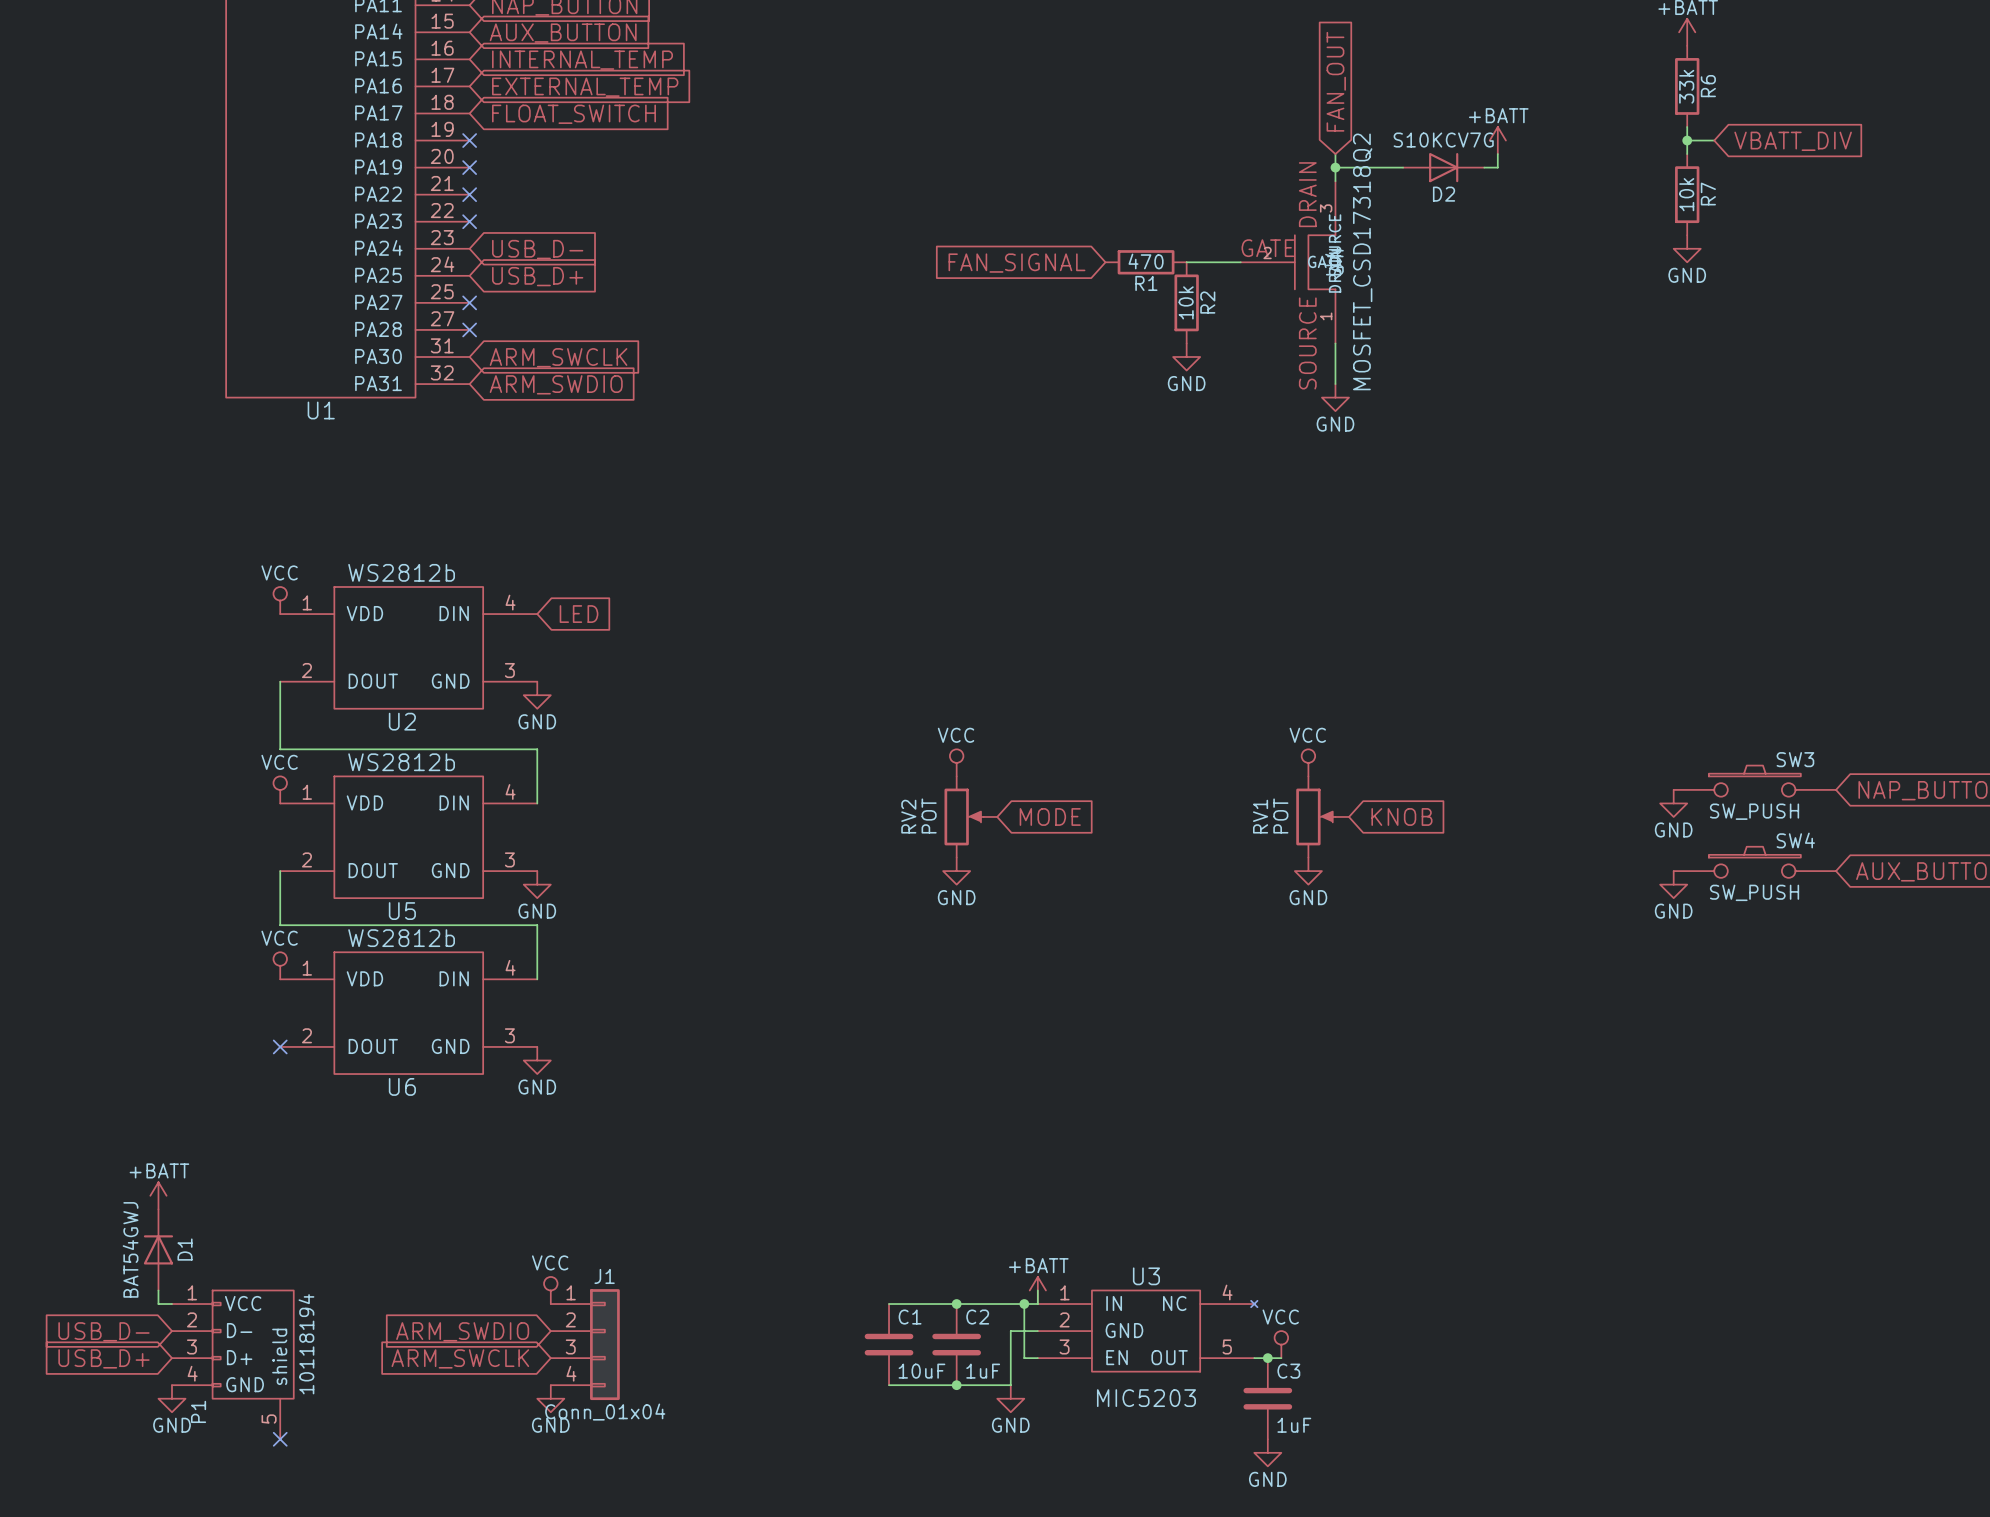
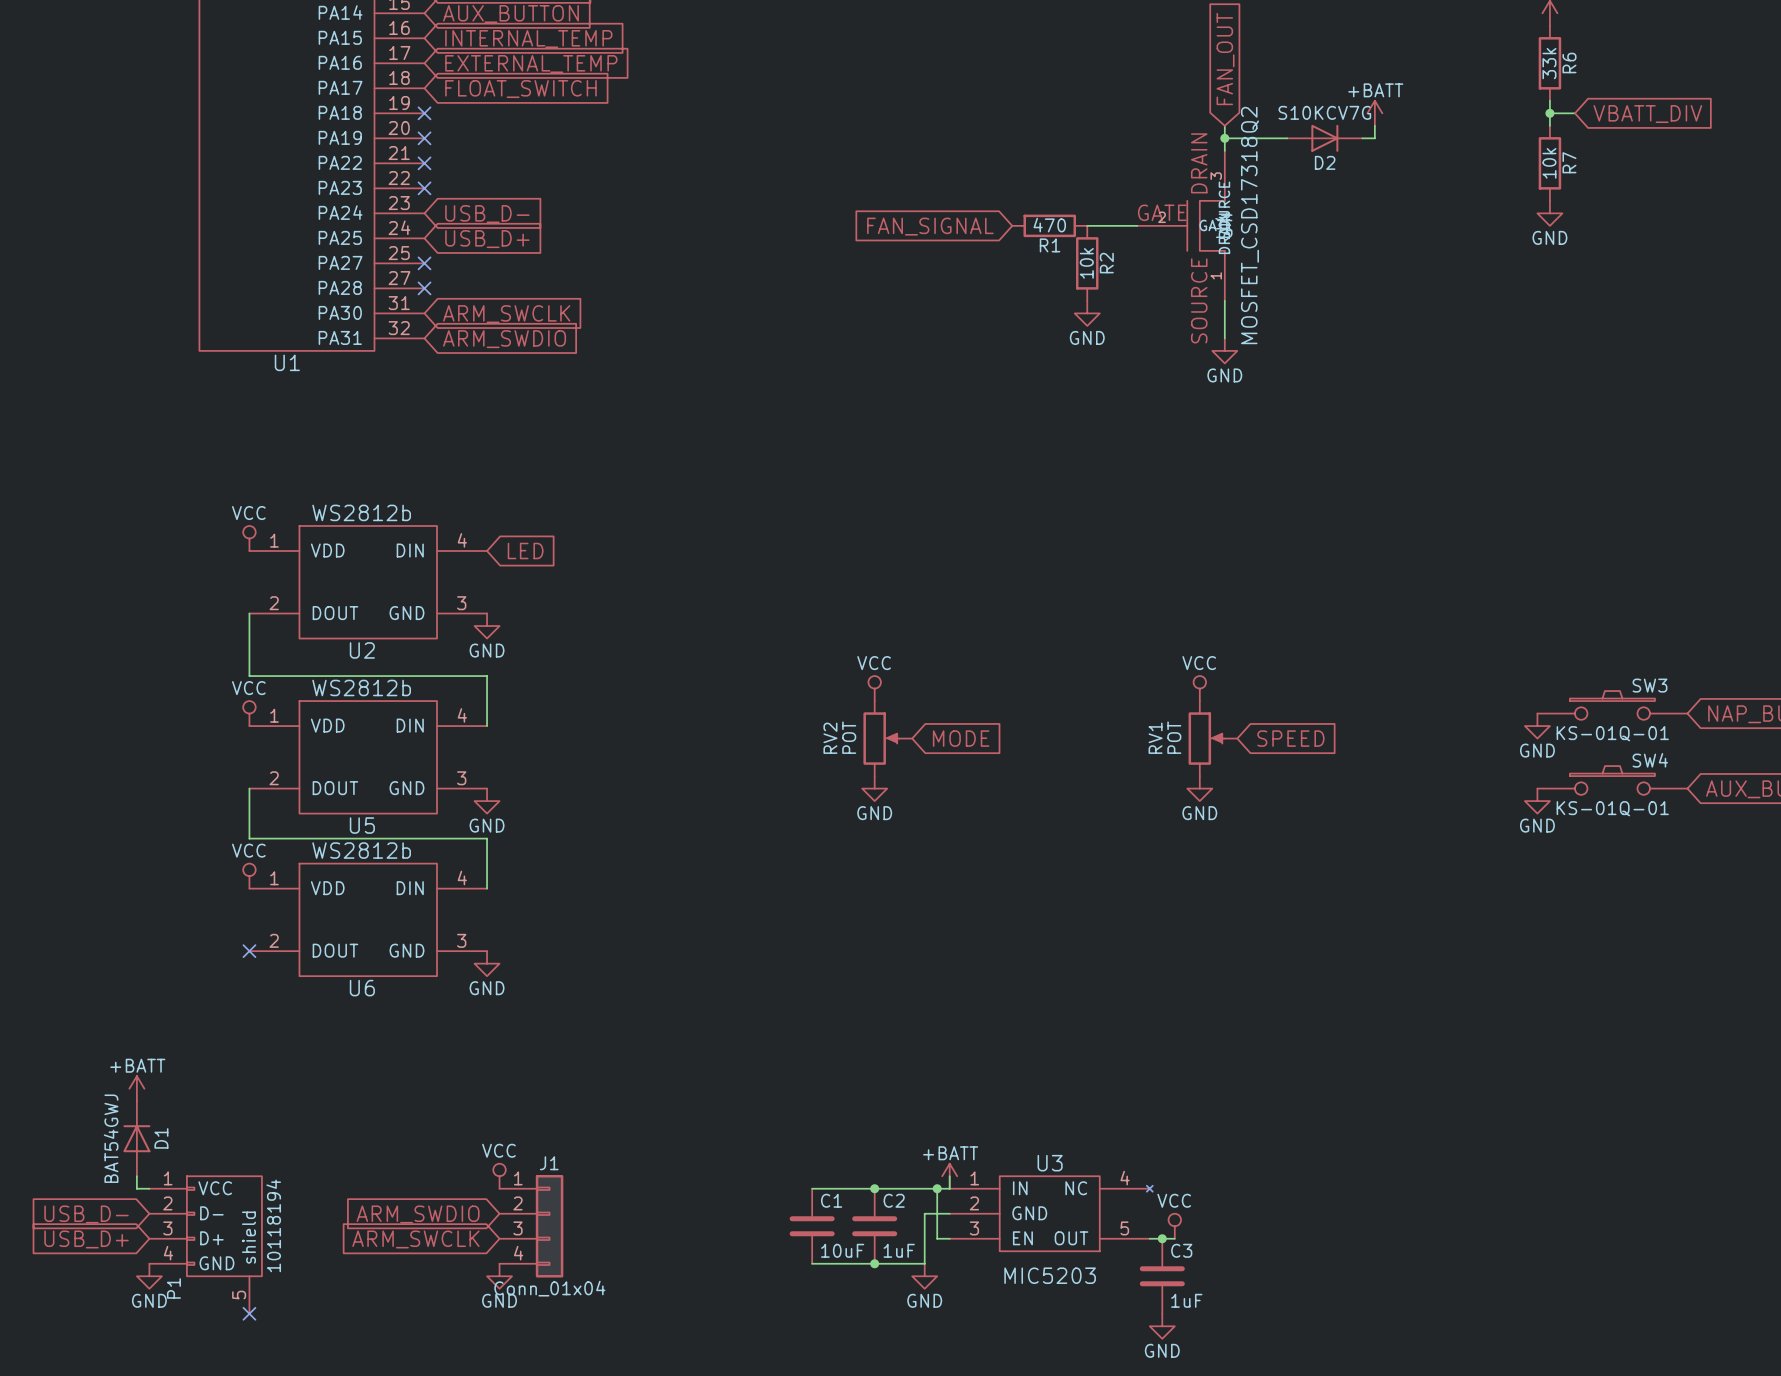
SW3 value: SW_PUSH (1754, 811) -> KS-01Q-01 (1612, 733)
global label: KNOB (1401, 816) -> SPEED (1290, 738)
SW4 value: SW_PUSH (1754, 892) -> KS-01Q-01 (1612, 808)

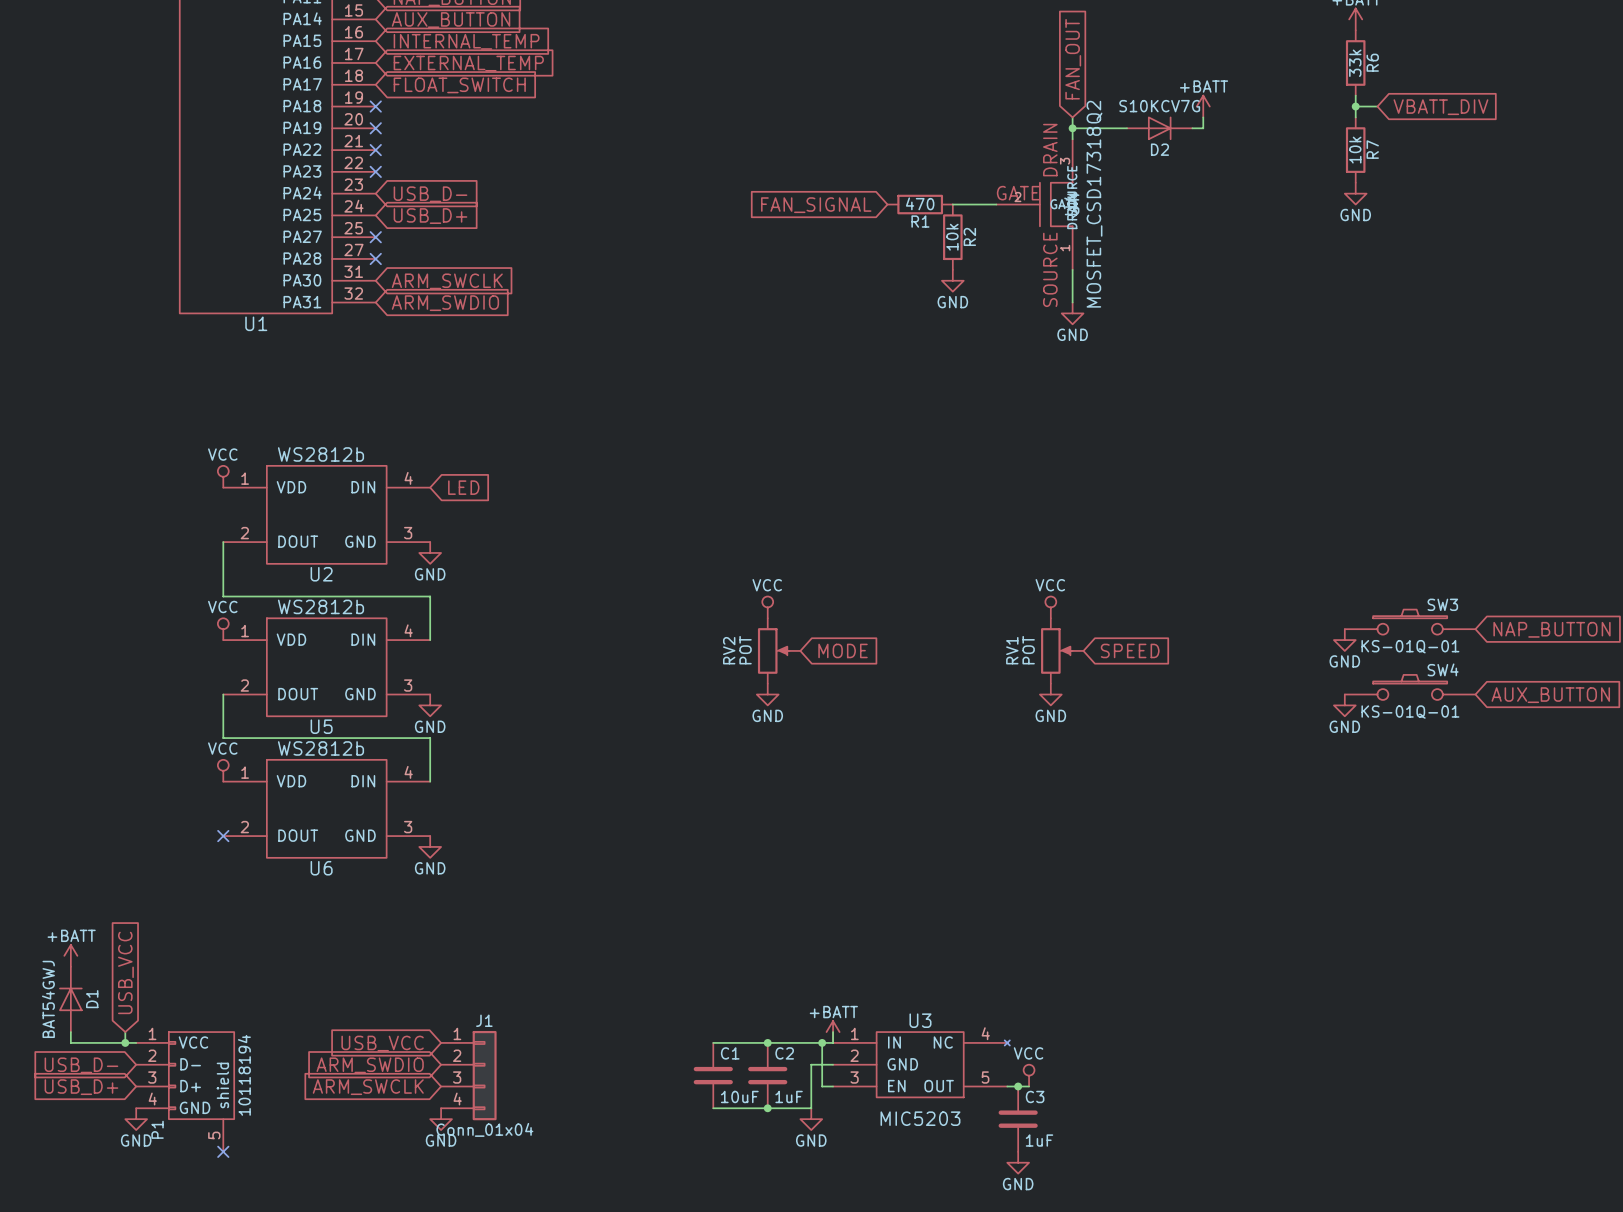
power symbol position: +BATT (136, 1088) -> +BATT (70, 955)
global label: none -> USB_VCC (125, 972)
D1 position: (136, 1138) -> (70, 999)
wire: none -> (70, 1032) (70, 1042) (125, 1042)
power symbol: VCC (499, 1176) -> none
junction: none -> (125, 1042)
global label: none -> USB_VCC (382, 1043)

